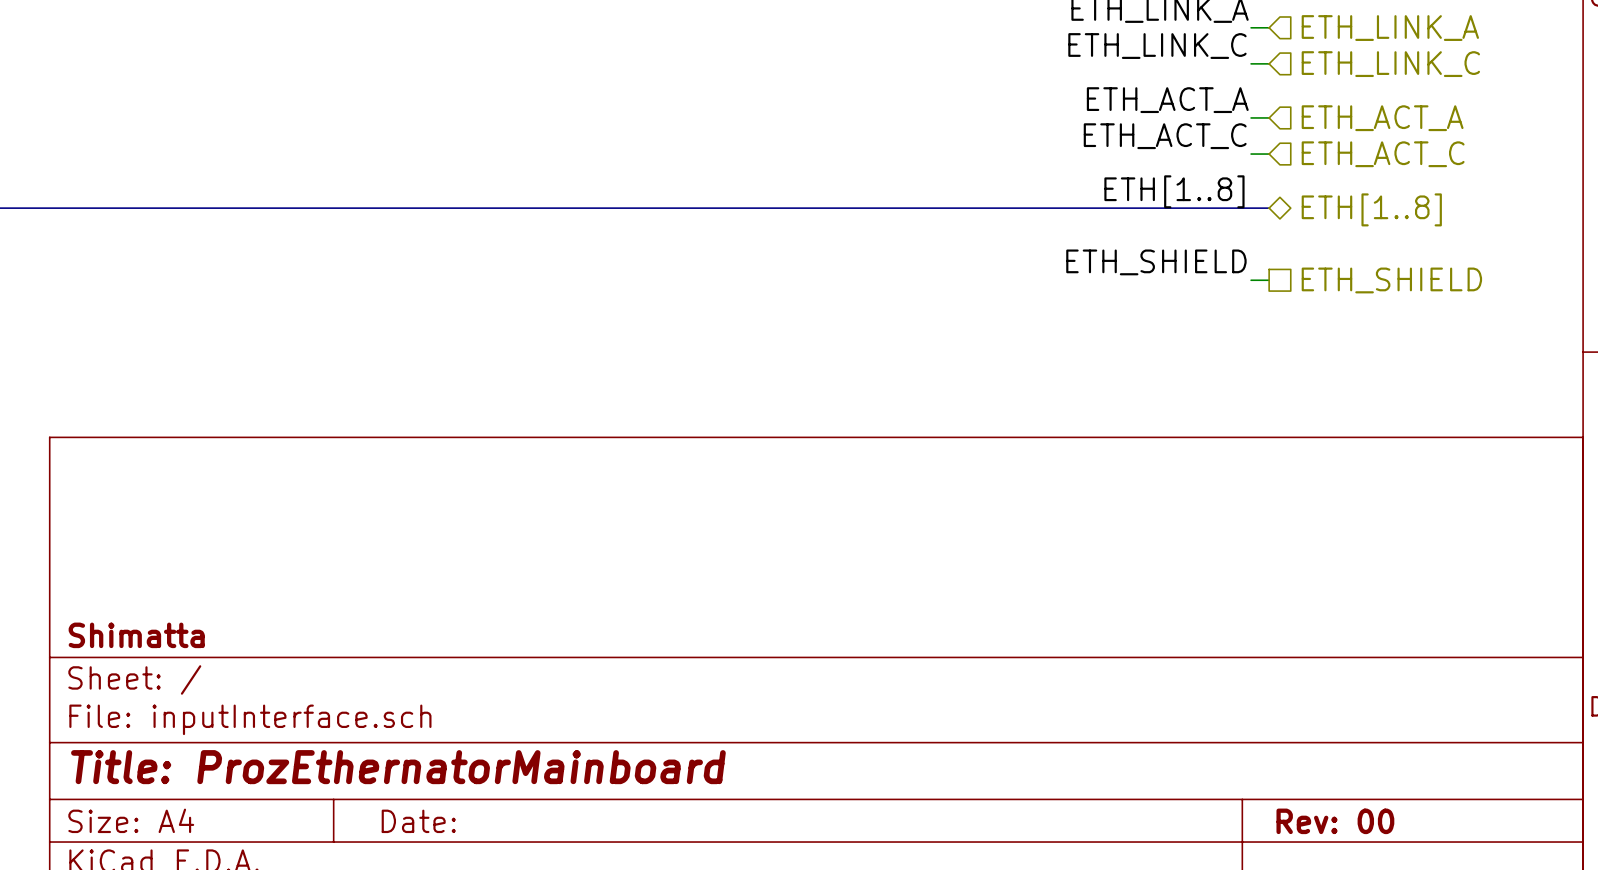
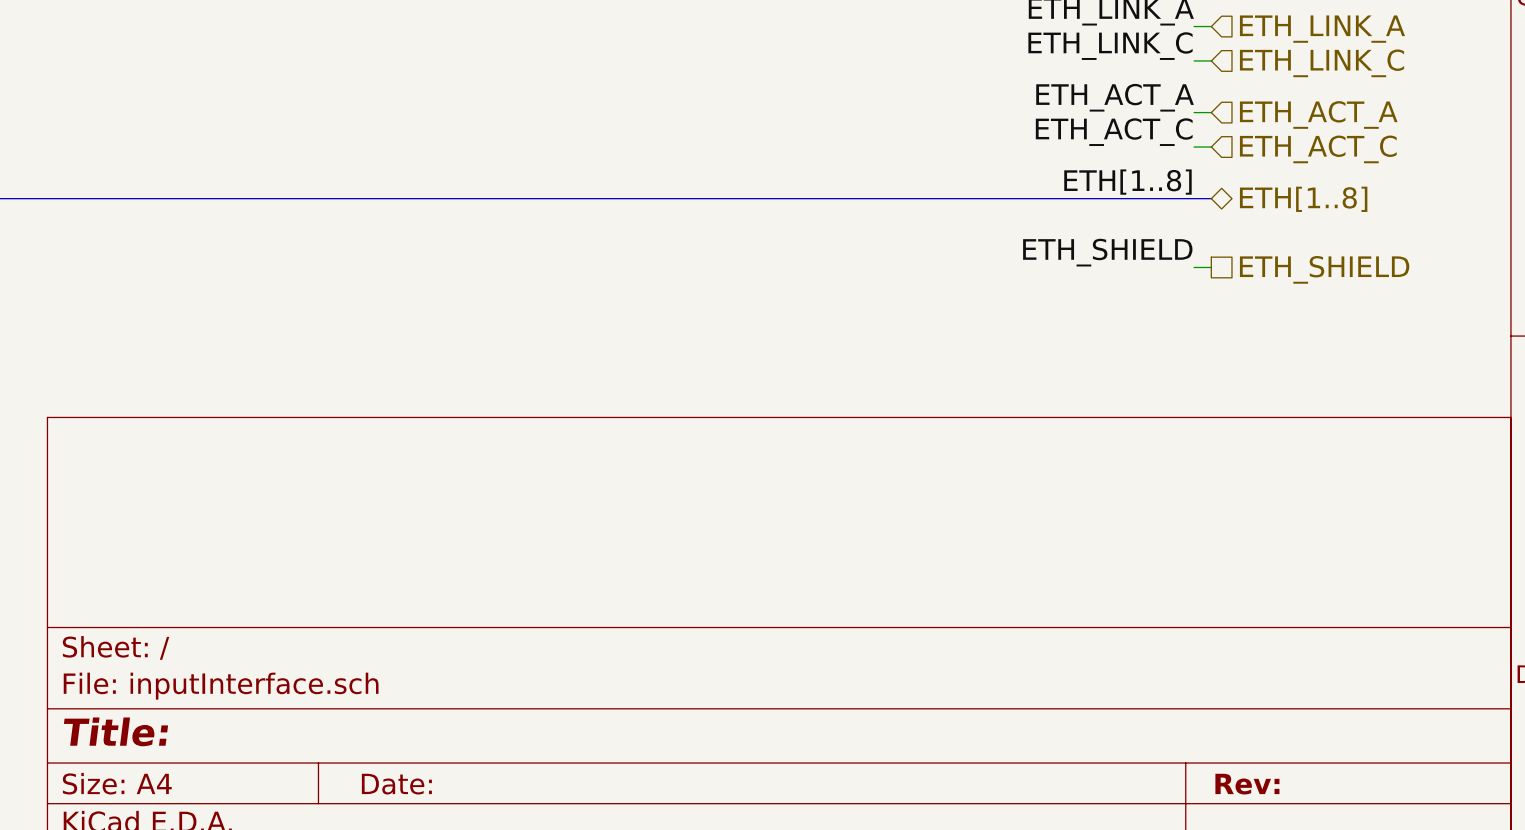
title block: Shimatta (136, 635) -> none
title block: Title: ProzEthernatorMainboard (398, 767) -> Title: (115, 731)
title block: Rev: 00 (1335, 821) -> Rev: (1247, 784)

